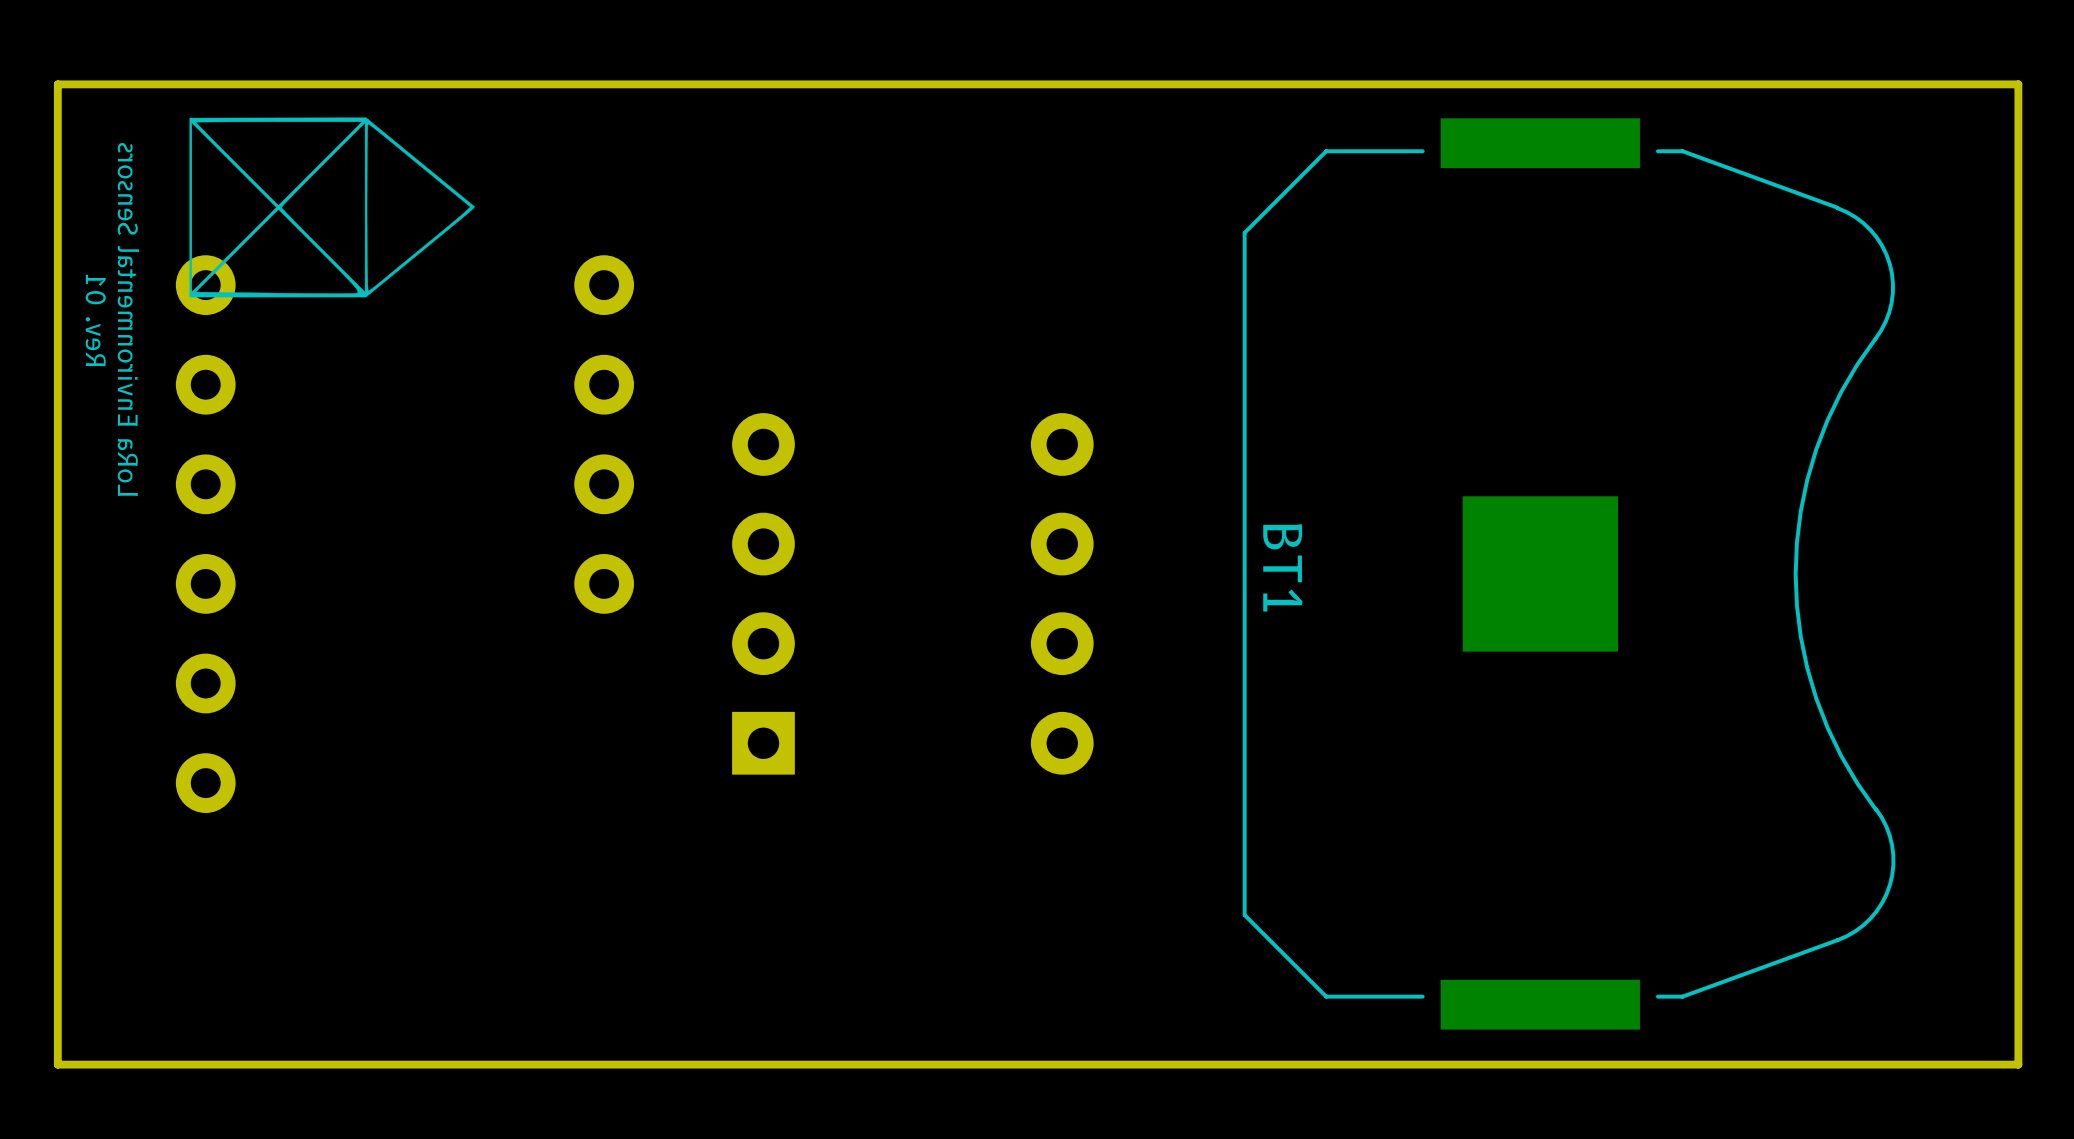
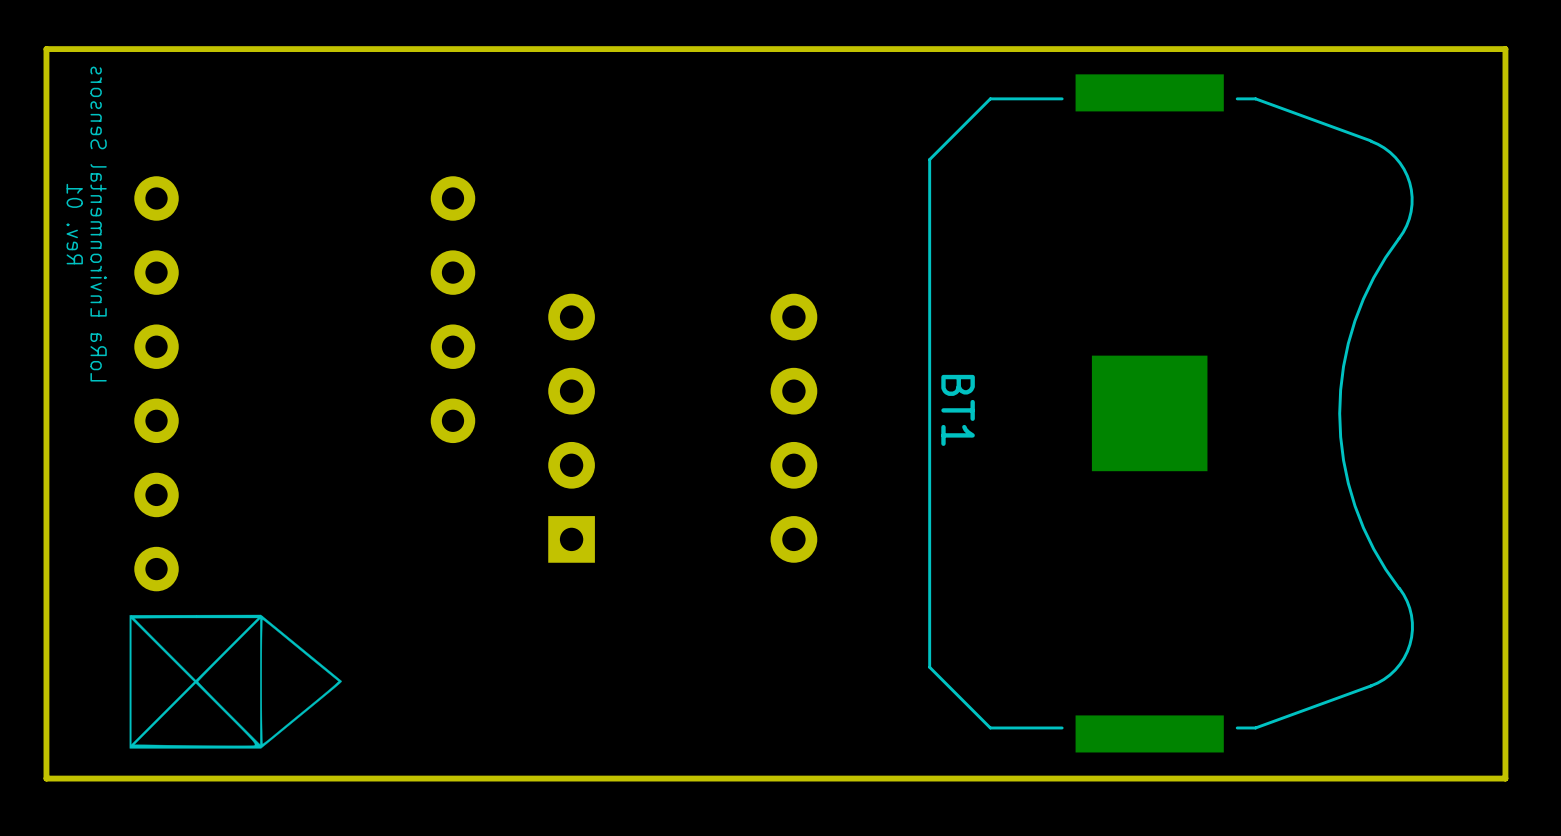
drawing position: (332, 207) -> (235, 681)

